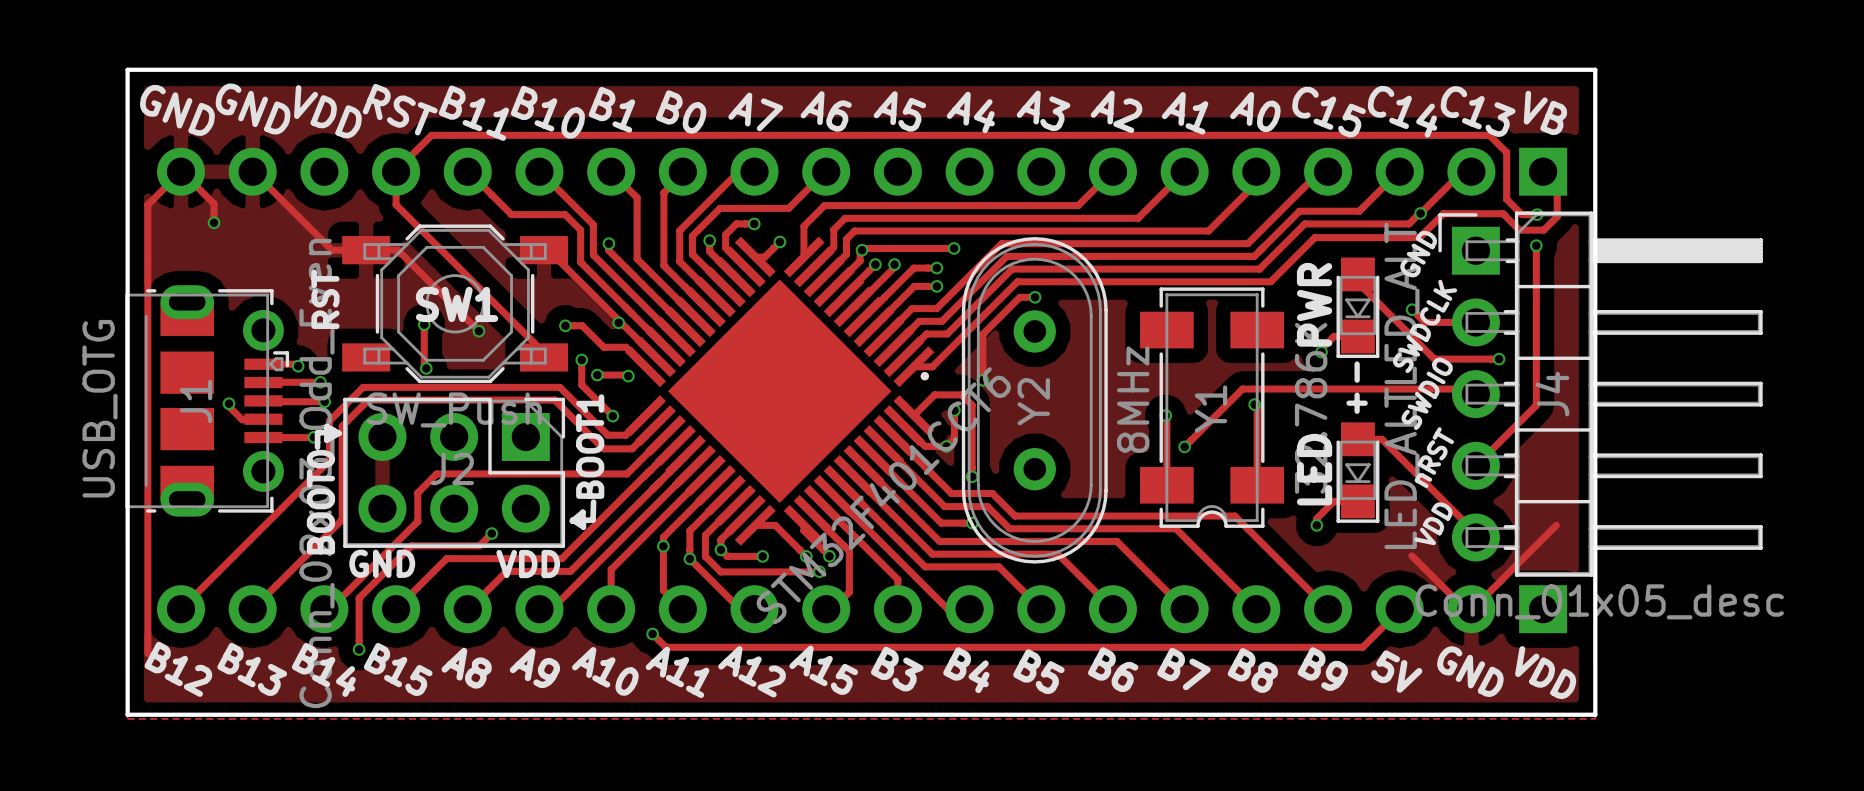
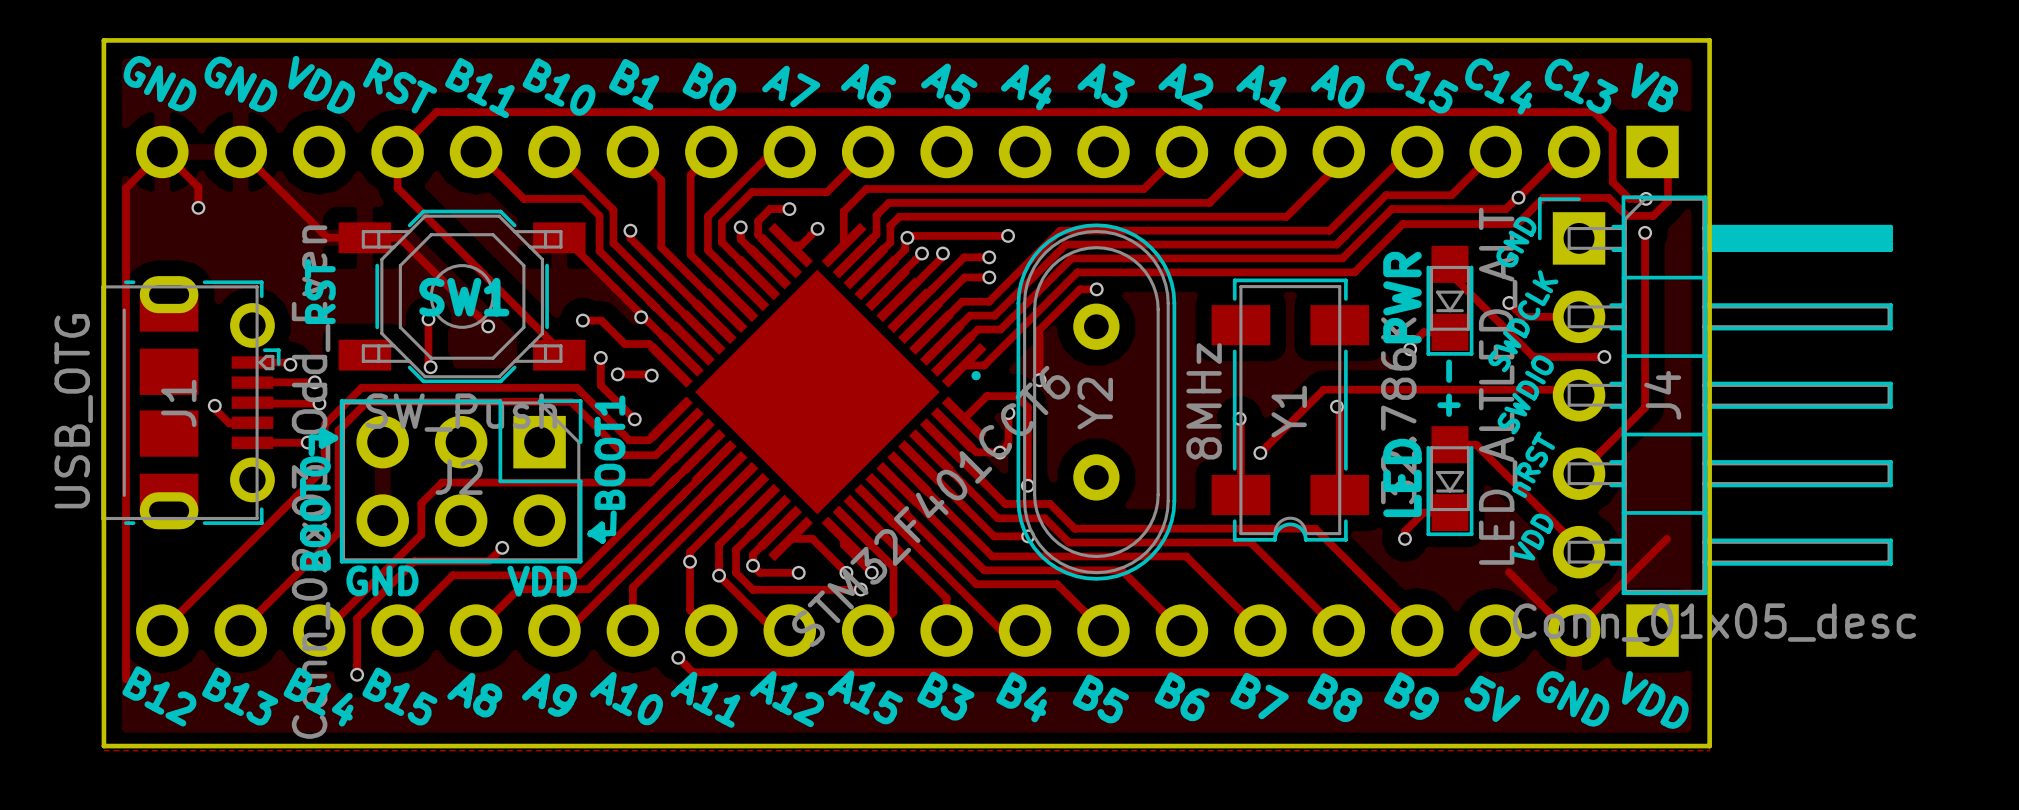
text rotation: 0° (253, 108) -> 6° clockwise (240, 84)
text rotation: 0° (400, 109) -> 6° clockwise (400, 85)
text rotation: 0° (611, 109) -> 6° clockwise (634, 84)
text rotation: 0° (177, 110) -> 6° clockwise (159, 83)
text rotation: 0° (1043, 110) -> 6° clockwise (1106, 85)
text rotation: 0° (327, 111) -> 6° clockwise (321, 84)
text rotation: 0° (681, 111) -> 6° clockwise (709, 86)
text rotation: 0° (755, 111) -> 6° clockwise (791, 86)
text rotation: 0° (826, 111) -> 6° clockwise (868, 86)
text rotation: 0° (899, 111) -> 11.5° clockwise (949, 86)
text rotation: 0° (1116, 111) -> 6° clockwise (1185, 86)
text rotation: 0° (1402, 111) -> 6° clockwise (1498, 86)
text rotation: 0° (1478, 111) -> 6° clockwise (1581, 86)
text rotation: 0° (547, 112) -> 6° clockwise (559, 86)
text rotation: 0° (970, 112) -> 6° clockwise (1026, 87)
text rotation: 0° (1255, 112) -> 6° clockwise (1337, 86)
text rotation: 0° (1329, 112) -> 6° clockwise (1422, 85)
text rotation: 0° (1545, 112) -> 6° clockwise (1654, 87)
text rotation: 0° (473, 113) -> 6° clockwise (479, 88)
text rotation: 0° (1185, 113) -> 6° clockwise (1261, 88)

